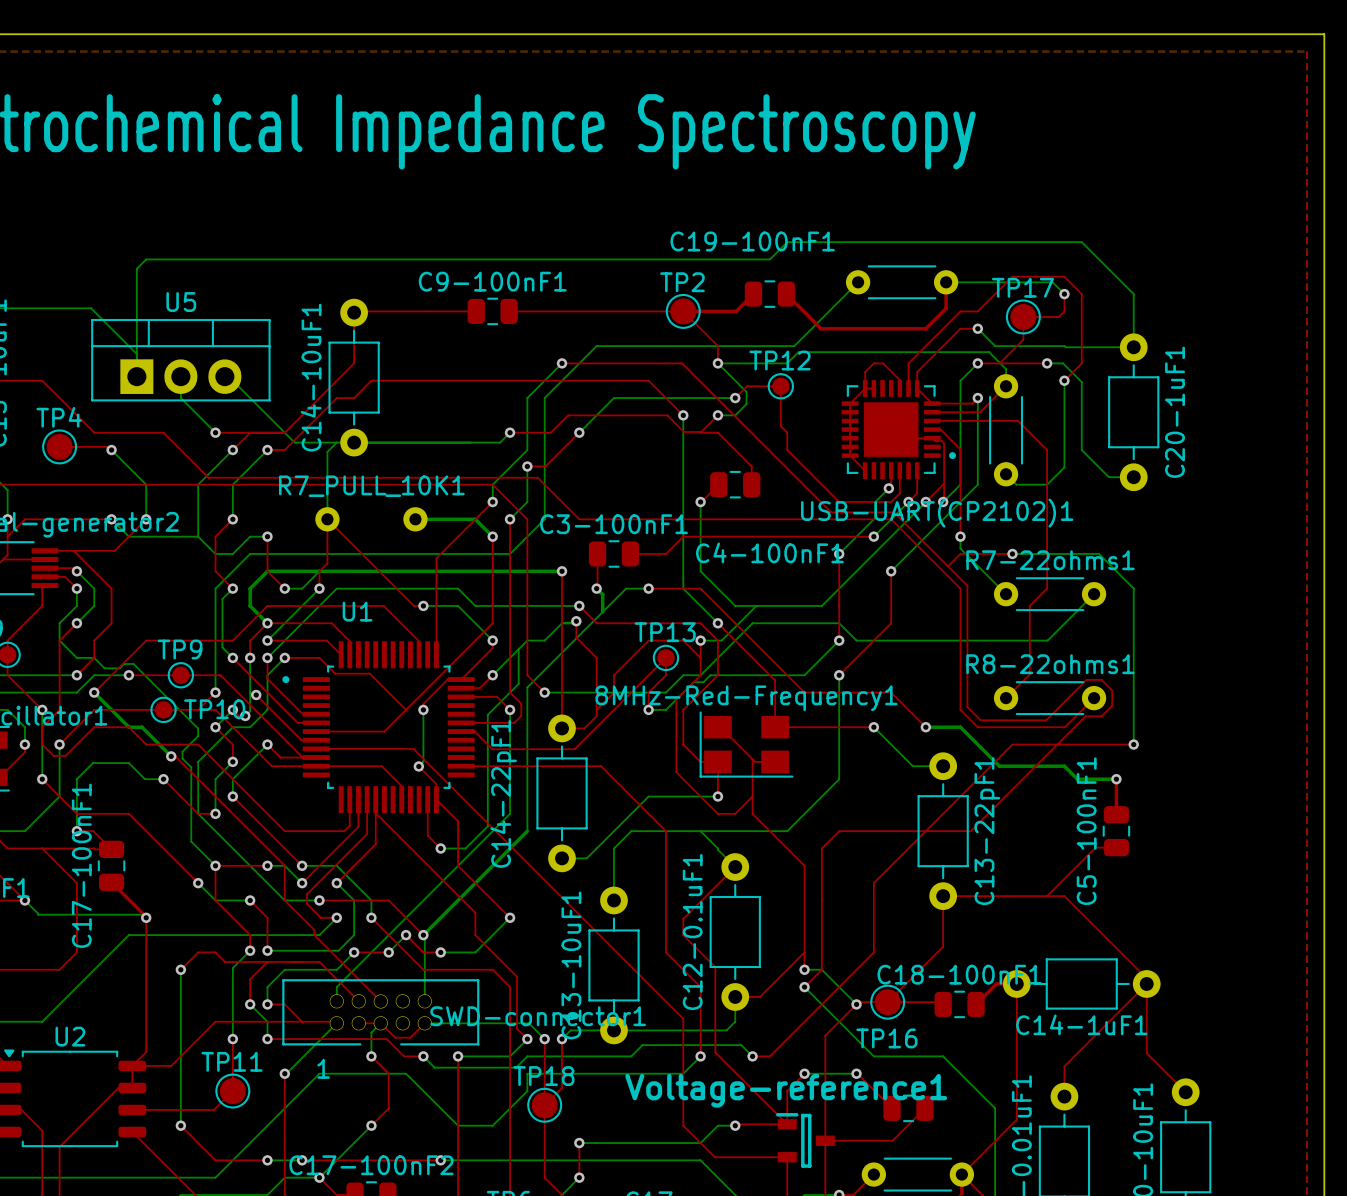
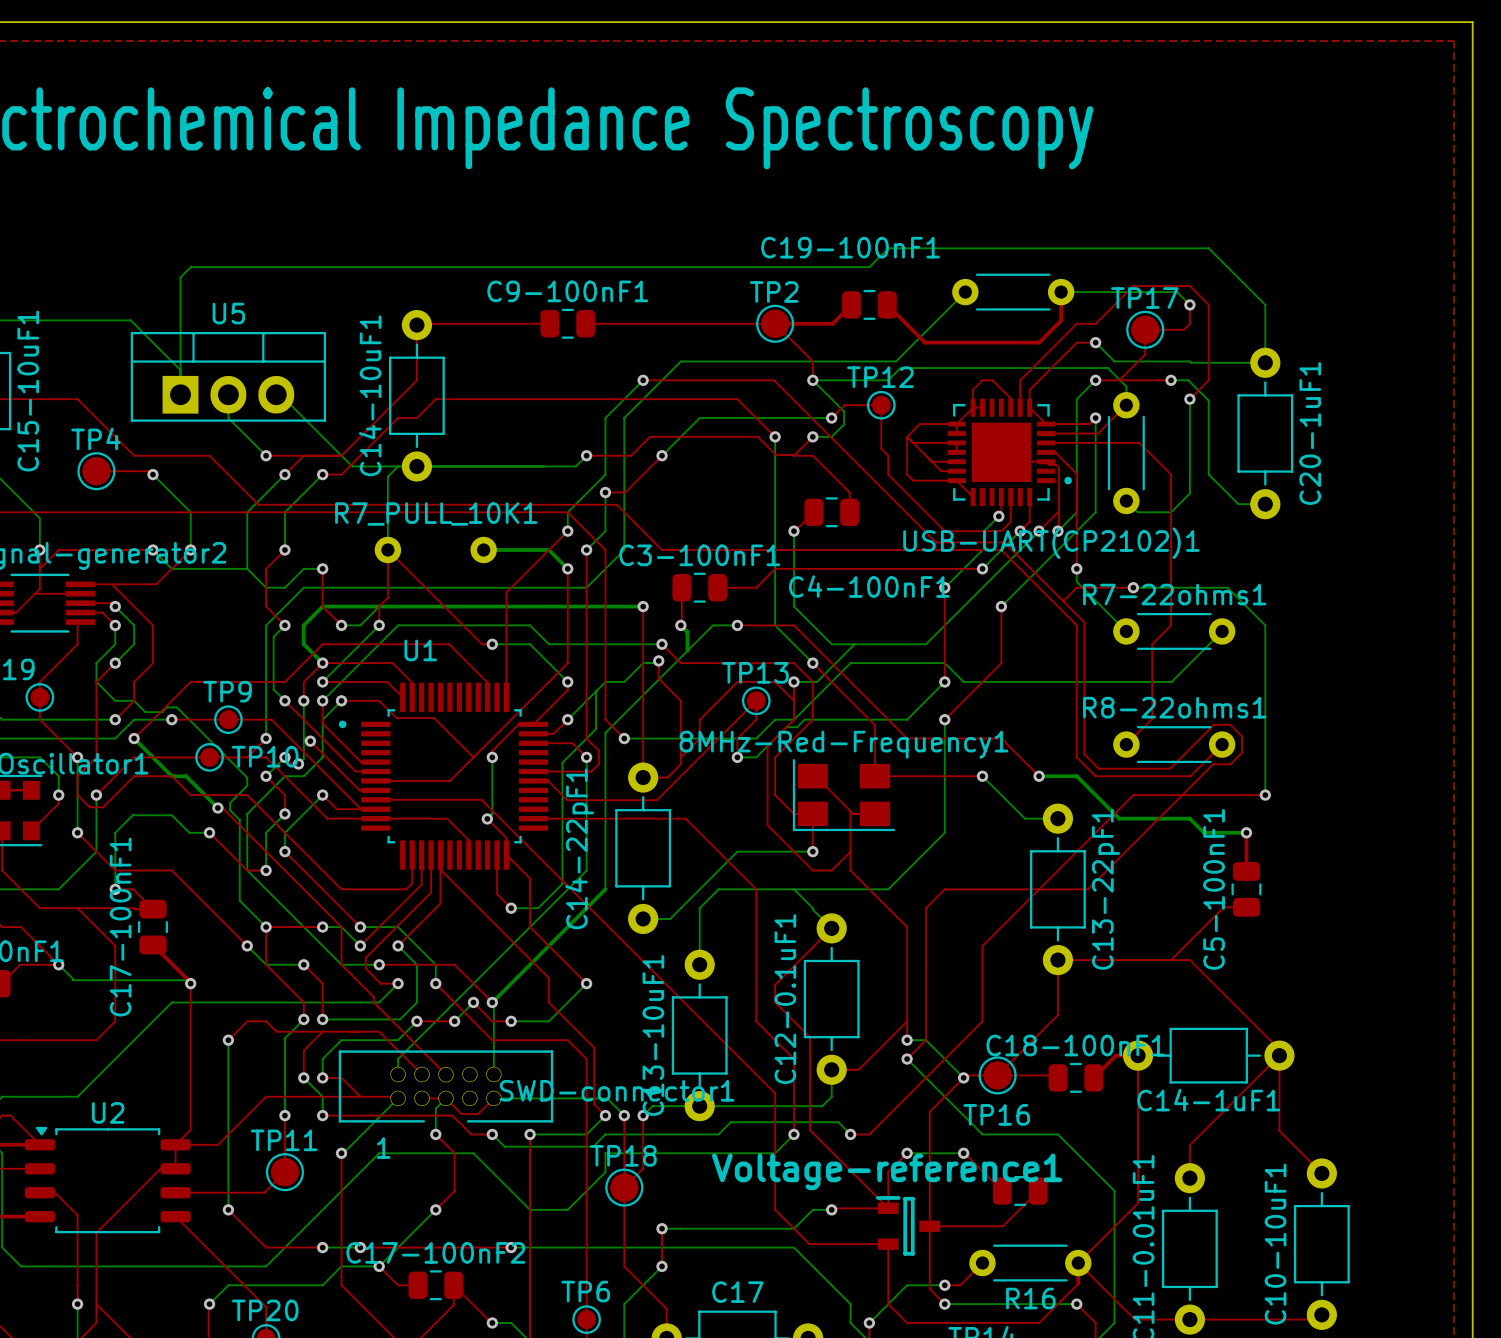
top track: none -> (956, 424) (919, 424) (907, 436)
top track: (850, 412) (850, 420) -> (913, 442) (956, 442)
top track: none -> (907, 436) (941, 471) (956, 471)
top track: (850, 429) (850, 455) -> (907, 436) (907, 474) (913, 480) (956, 480)
top track: none -> (931, 461) (956, 461)

